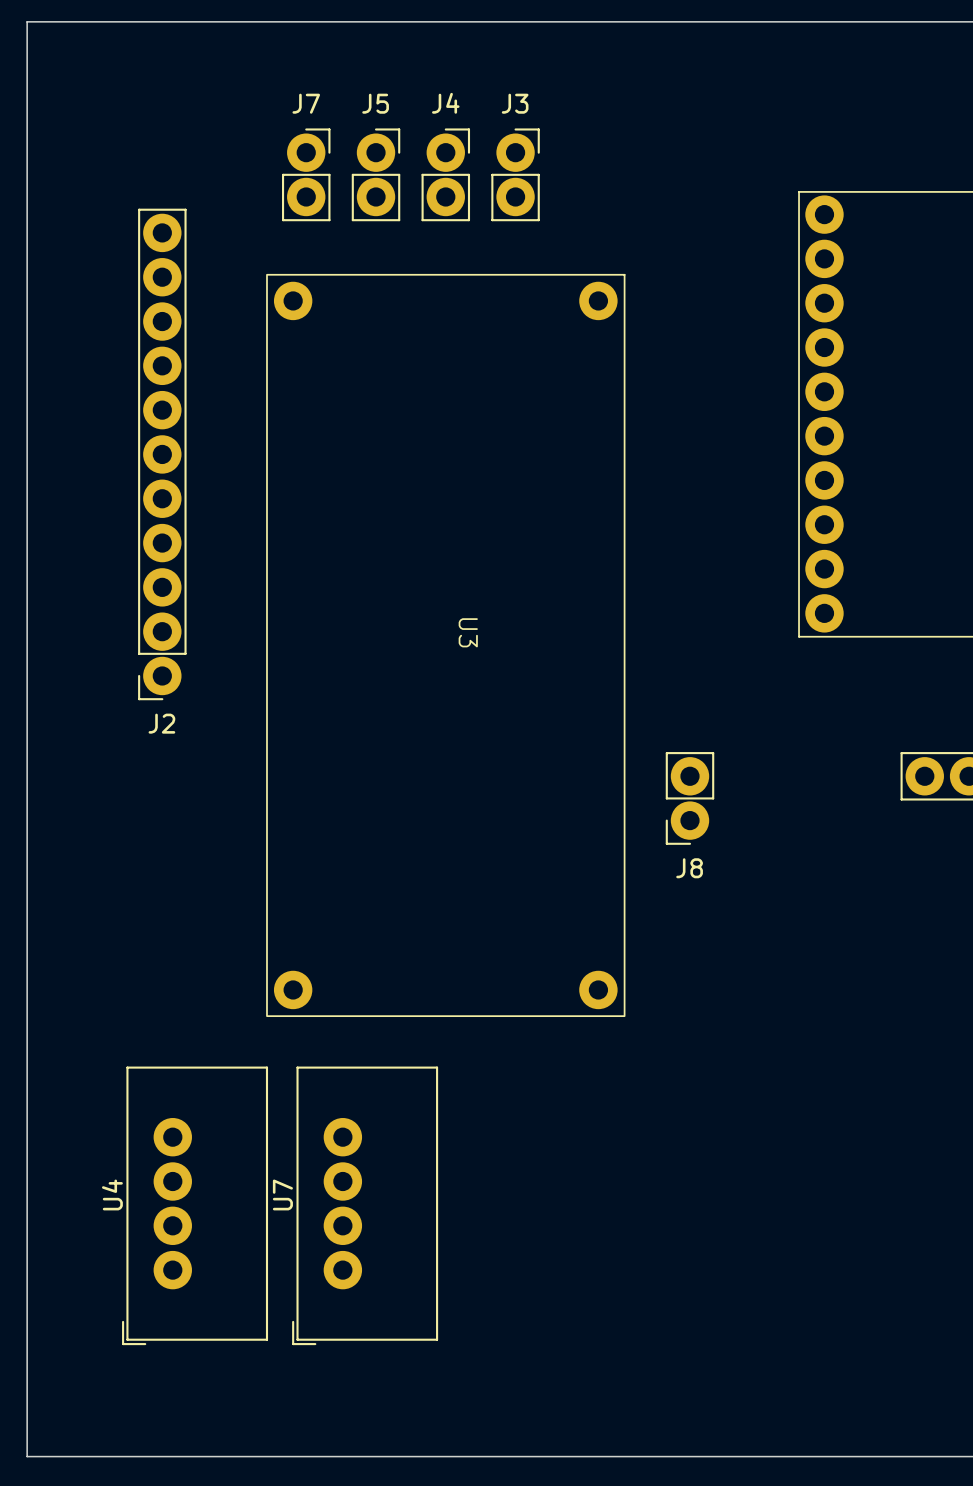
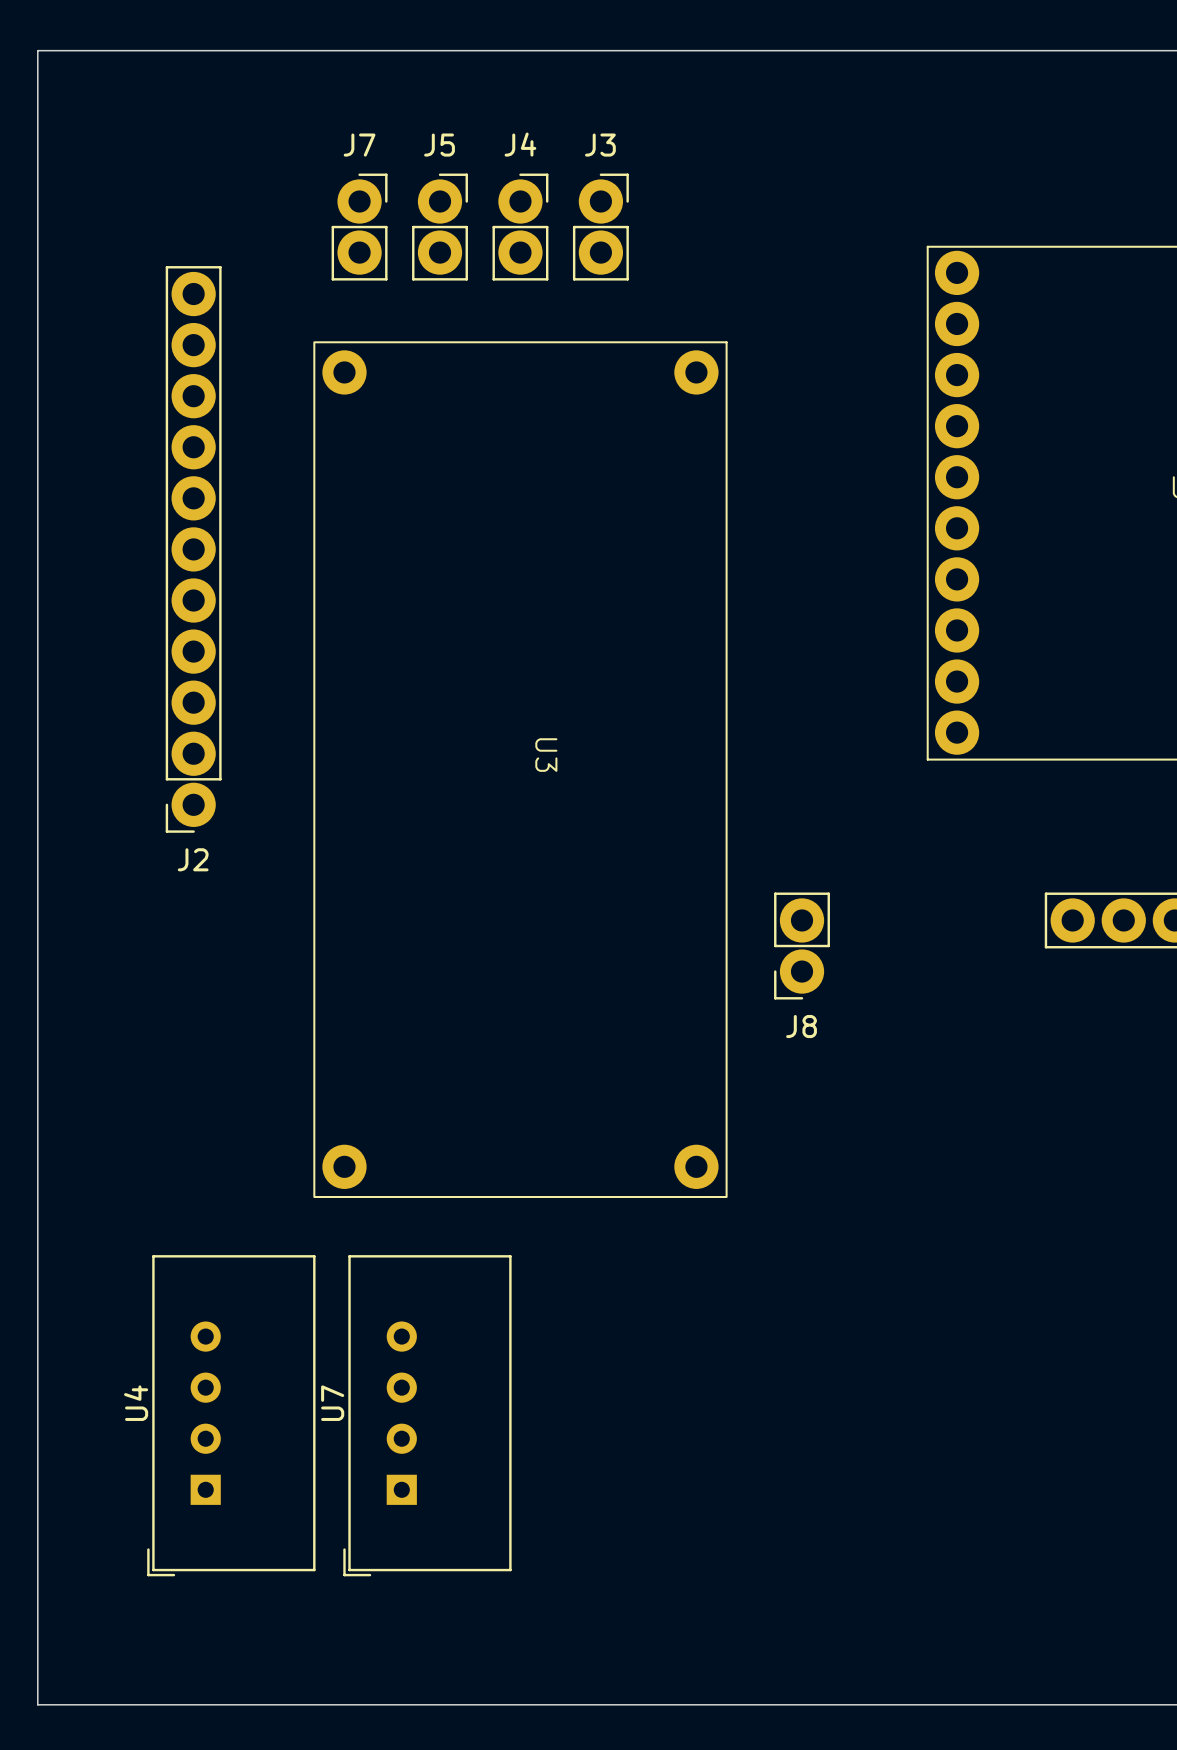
U4 footprint: [122, 1066, 269, 1346] -> [147, 1255, 316, 1577]
U7 footprint: [292, 1066, 439, 1346] -> [343, 1255, 512, 1577]

